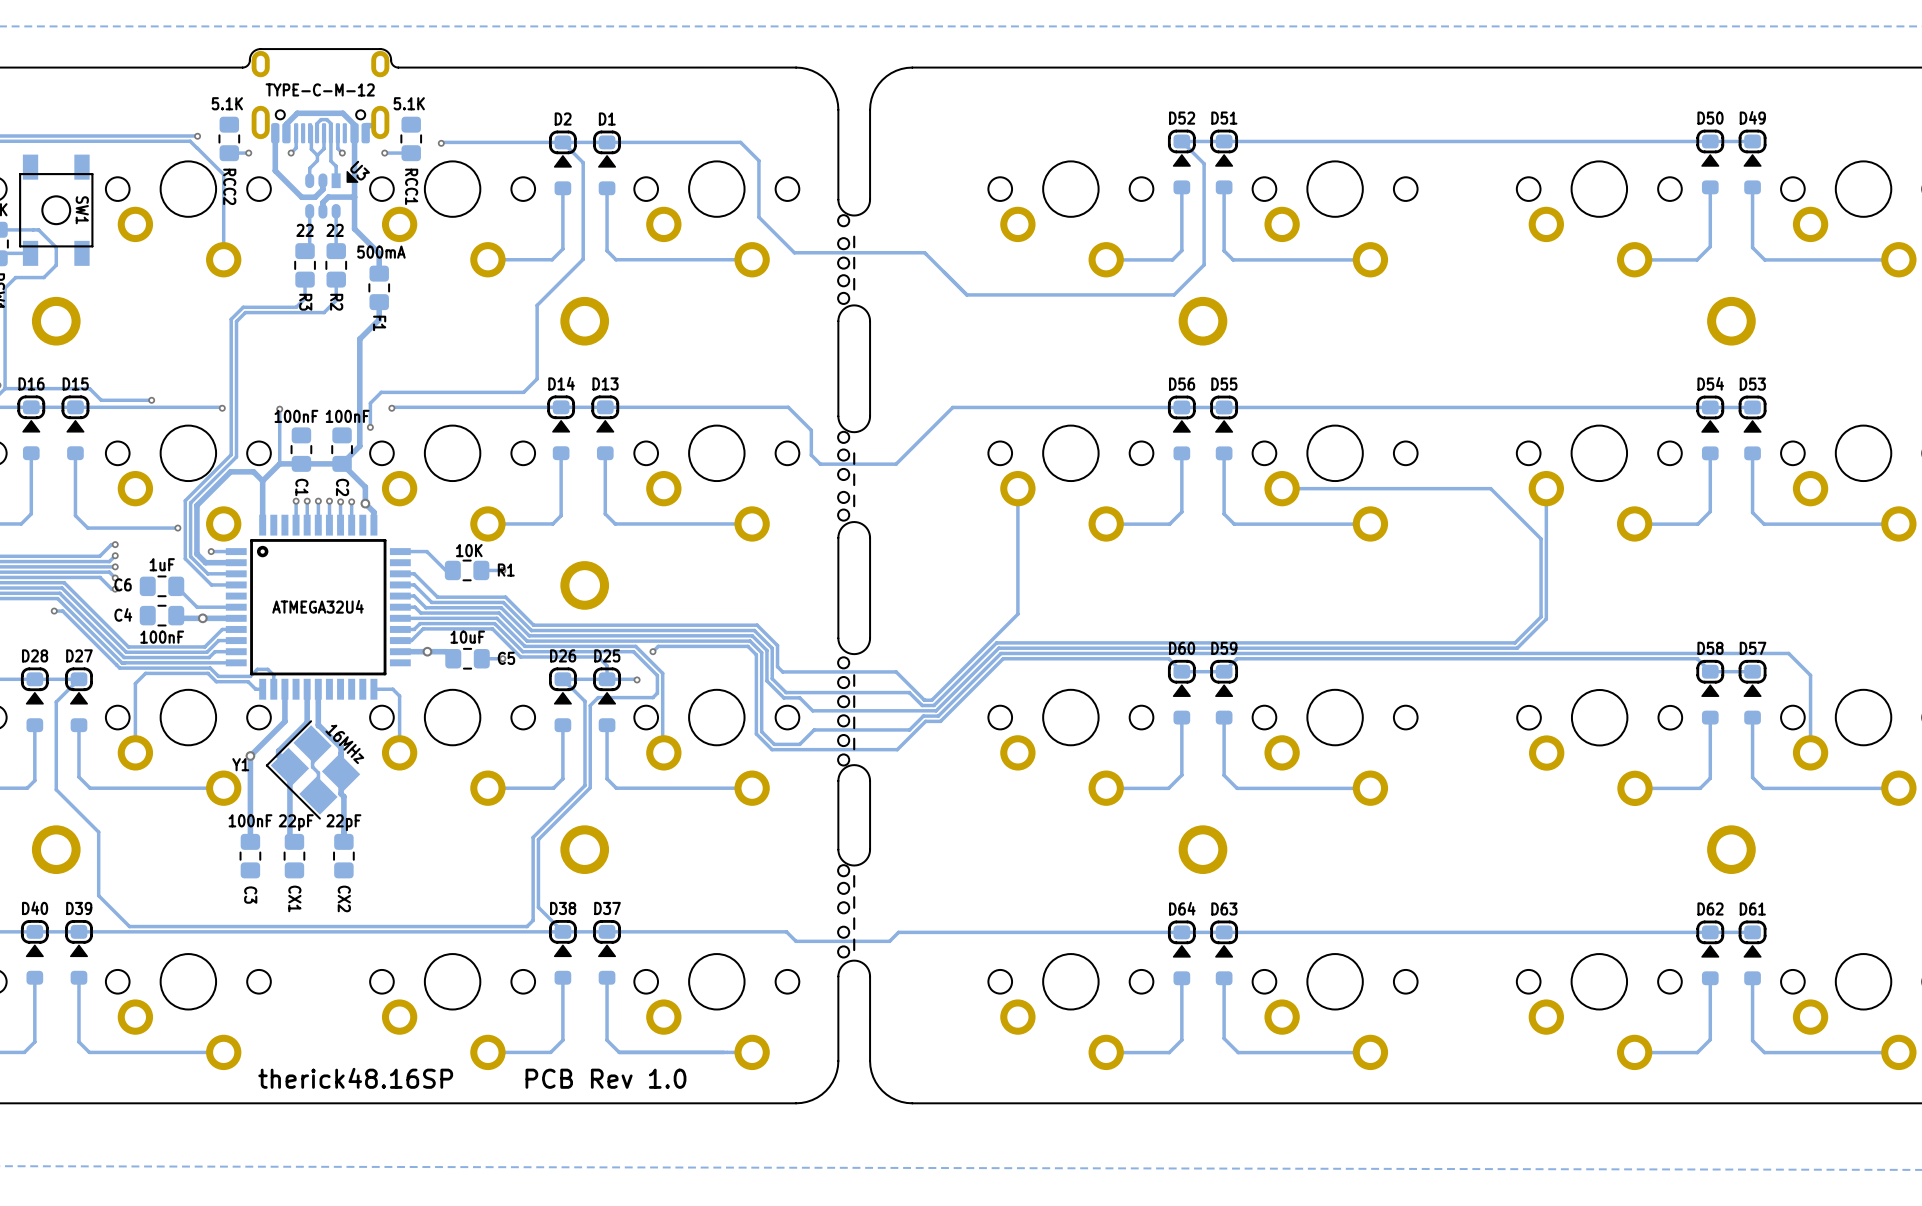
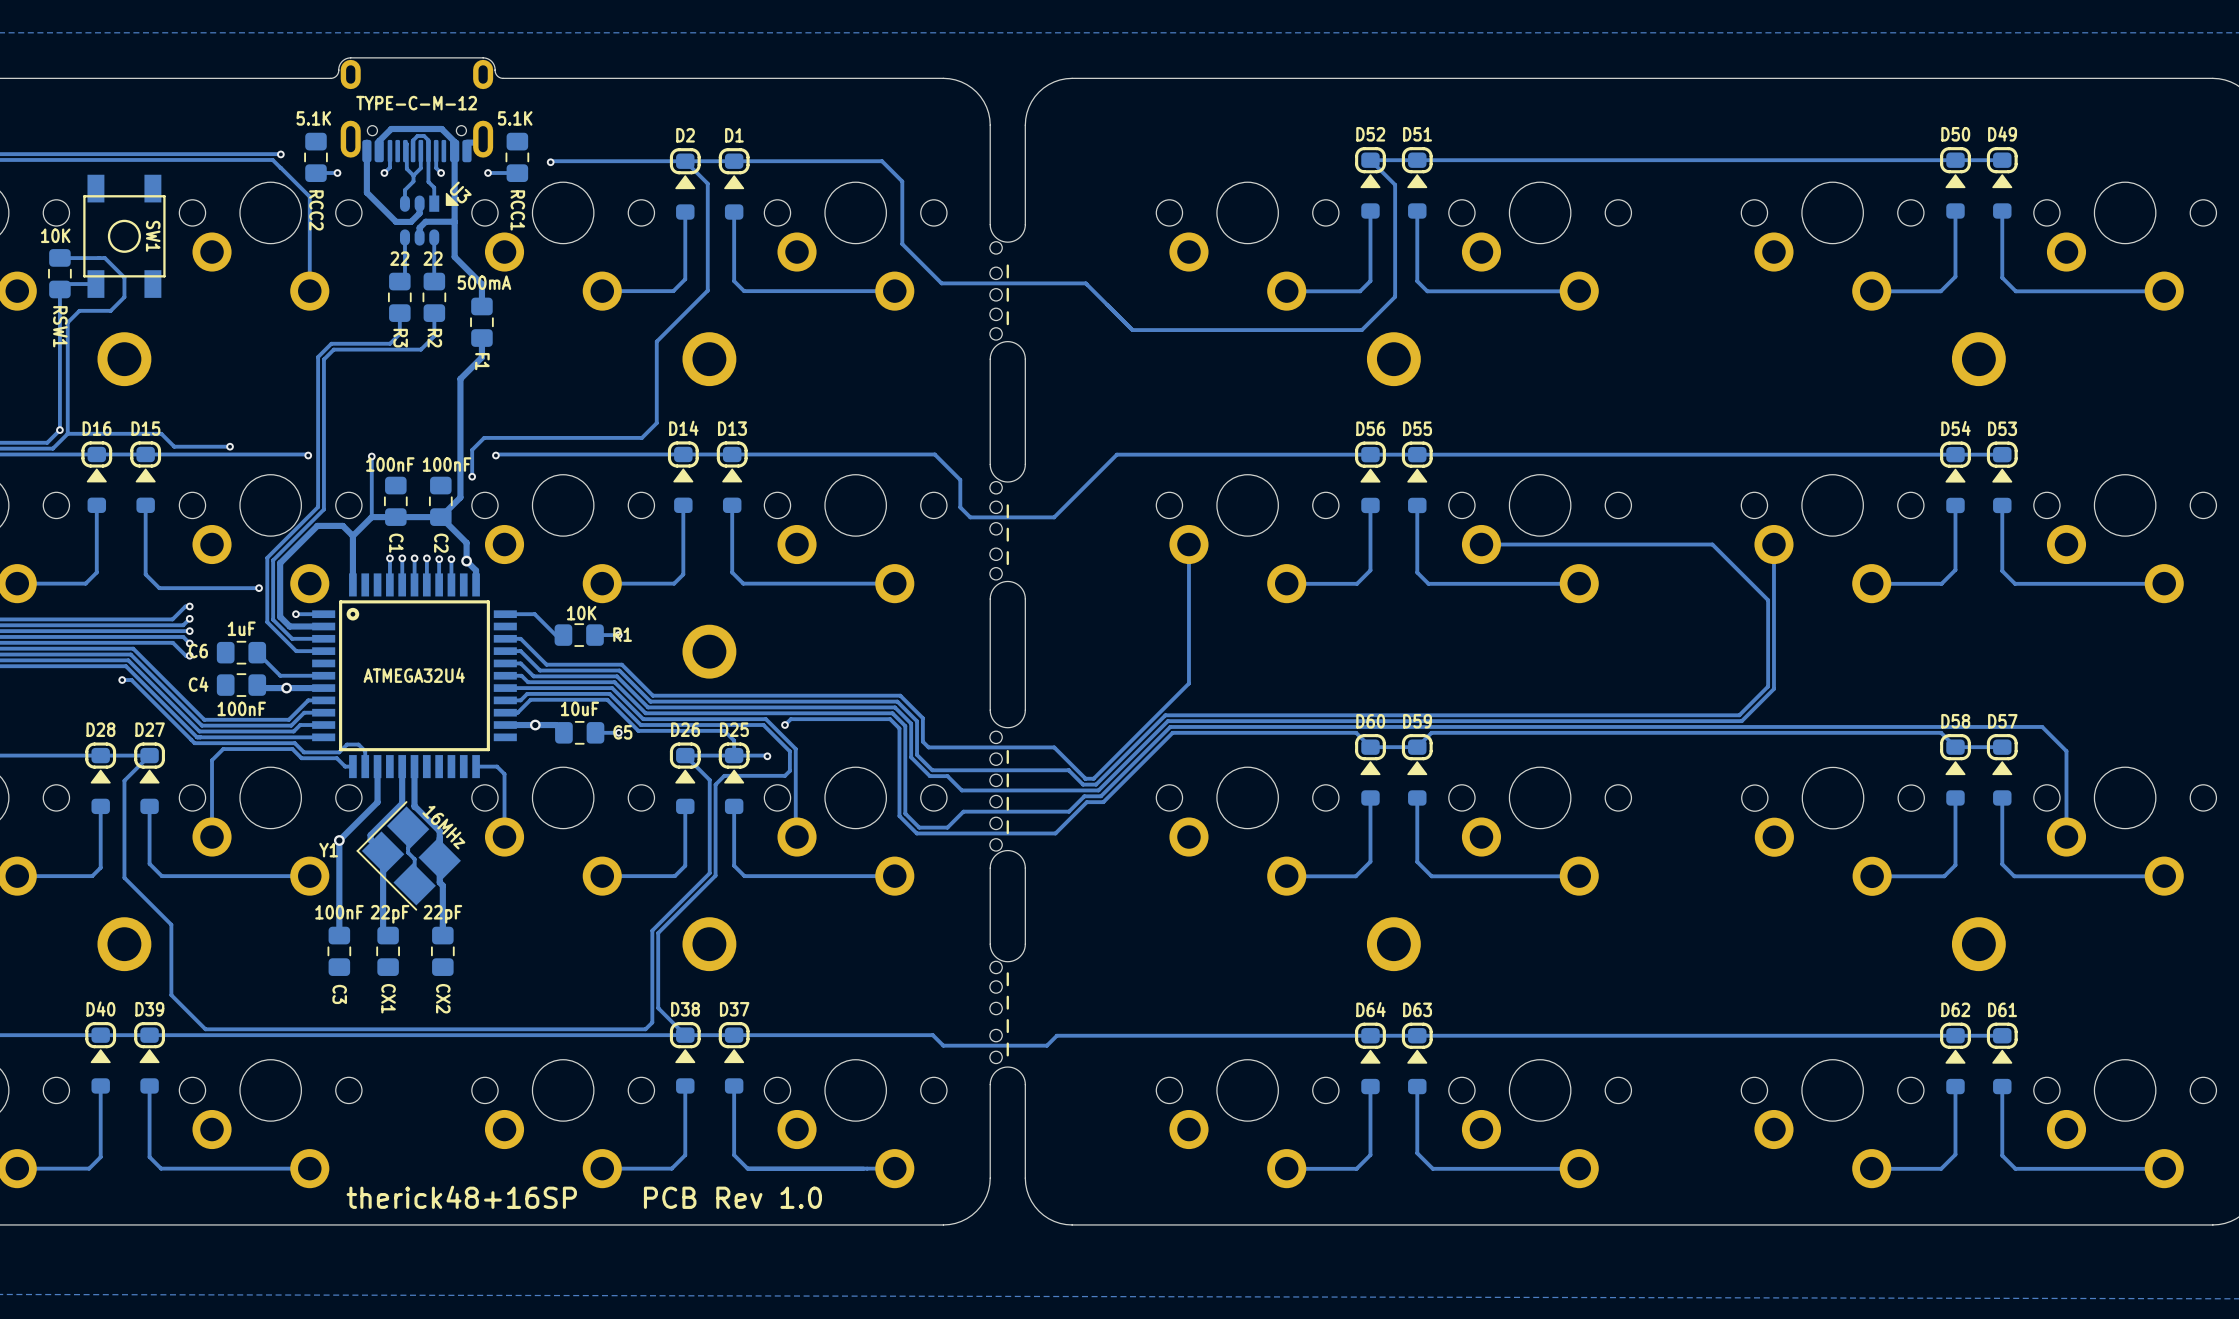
text: therick48.16SP (355, 1078) -> therick48+16SP (461, 1197)

